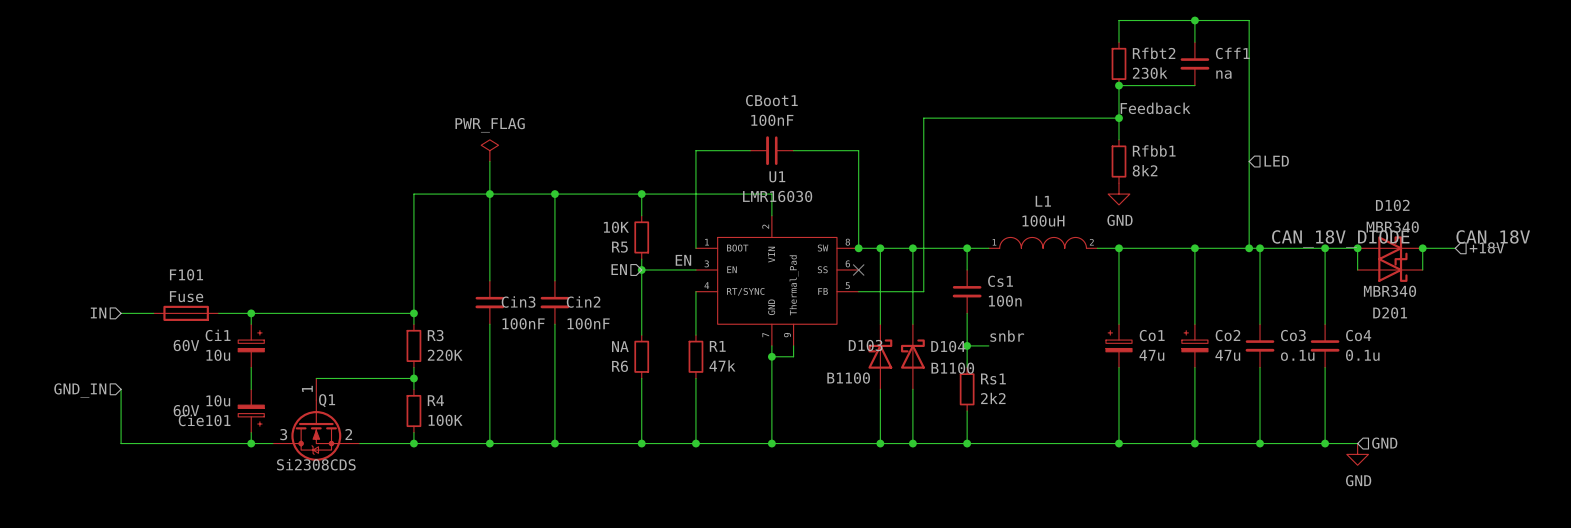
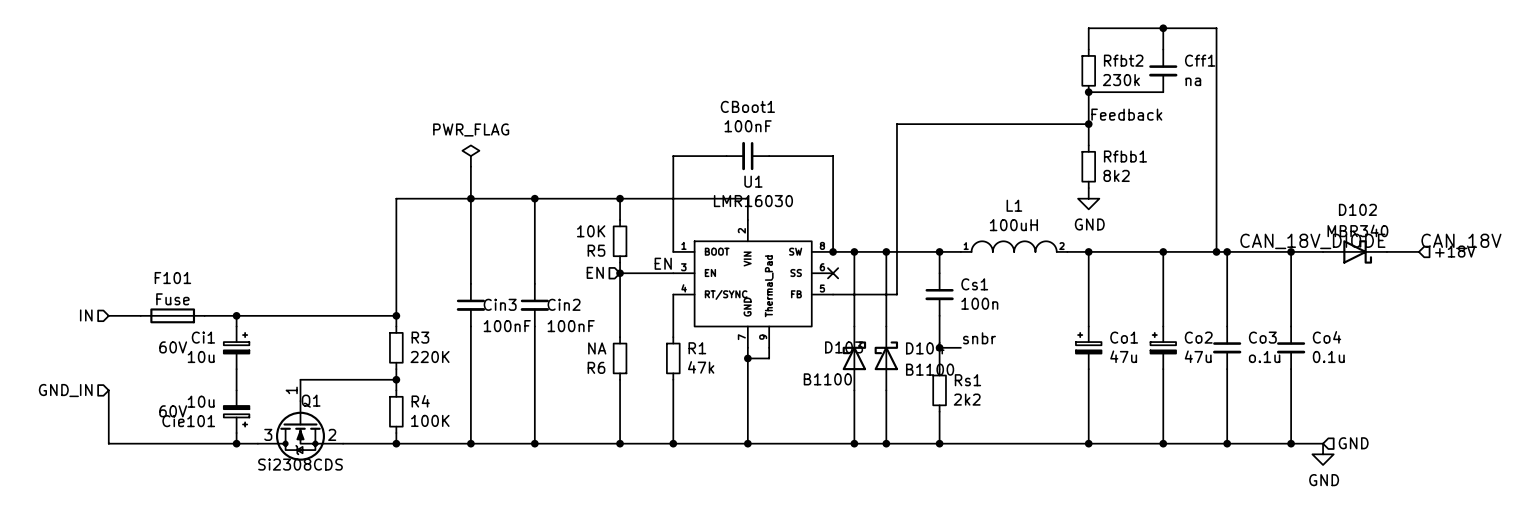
hierarchical label: LED (1276, 161) -> none
wire: (1357, 248) (1357, 269) -> none
junction: (1357, 248) -> none
wire: (1422, 248) (1422, 269) -> none
junction: (1422, 248) -> none
D201: MBR340 (1390, 269) -> none

